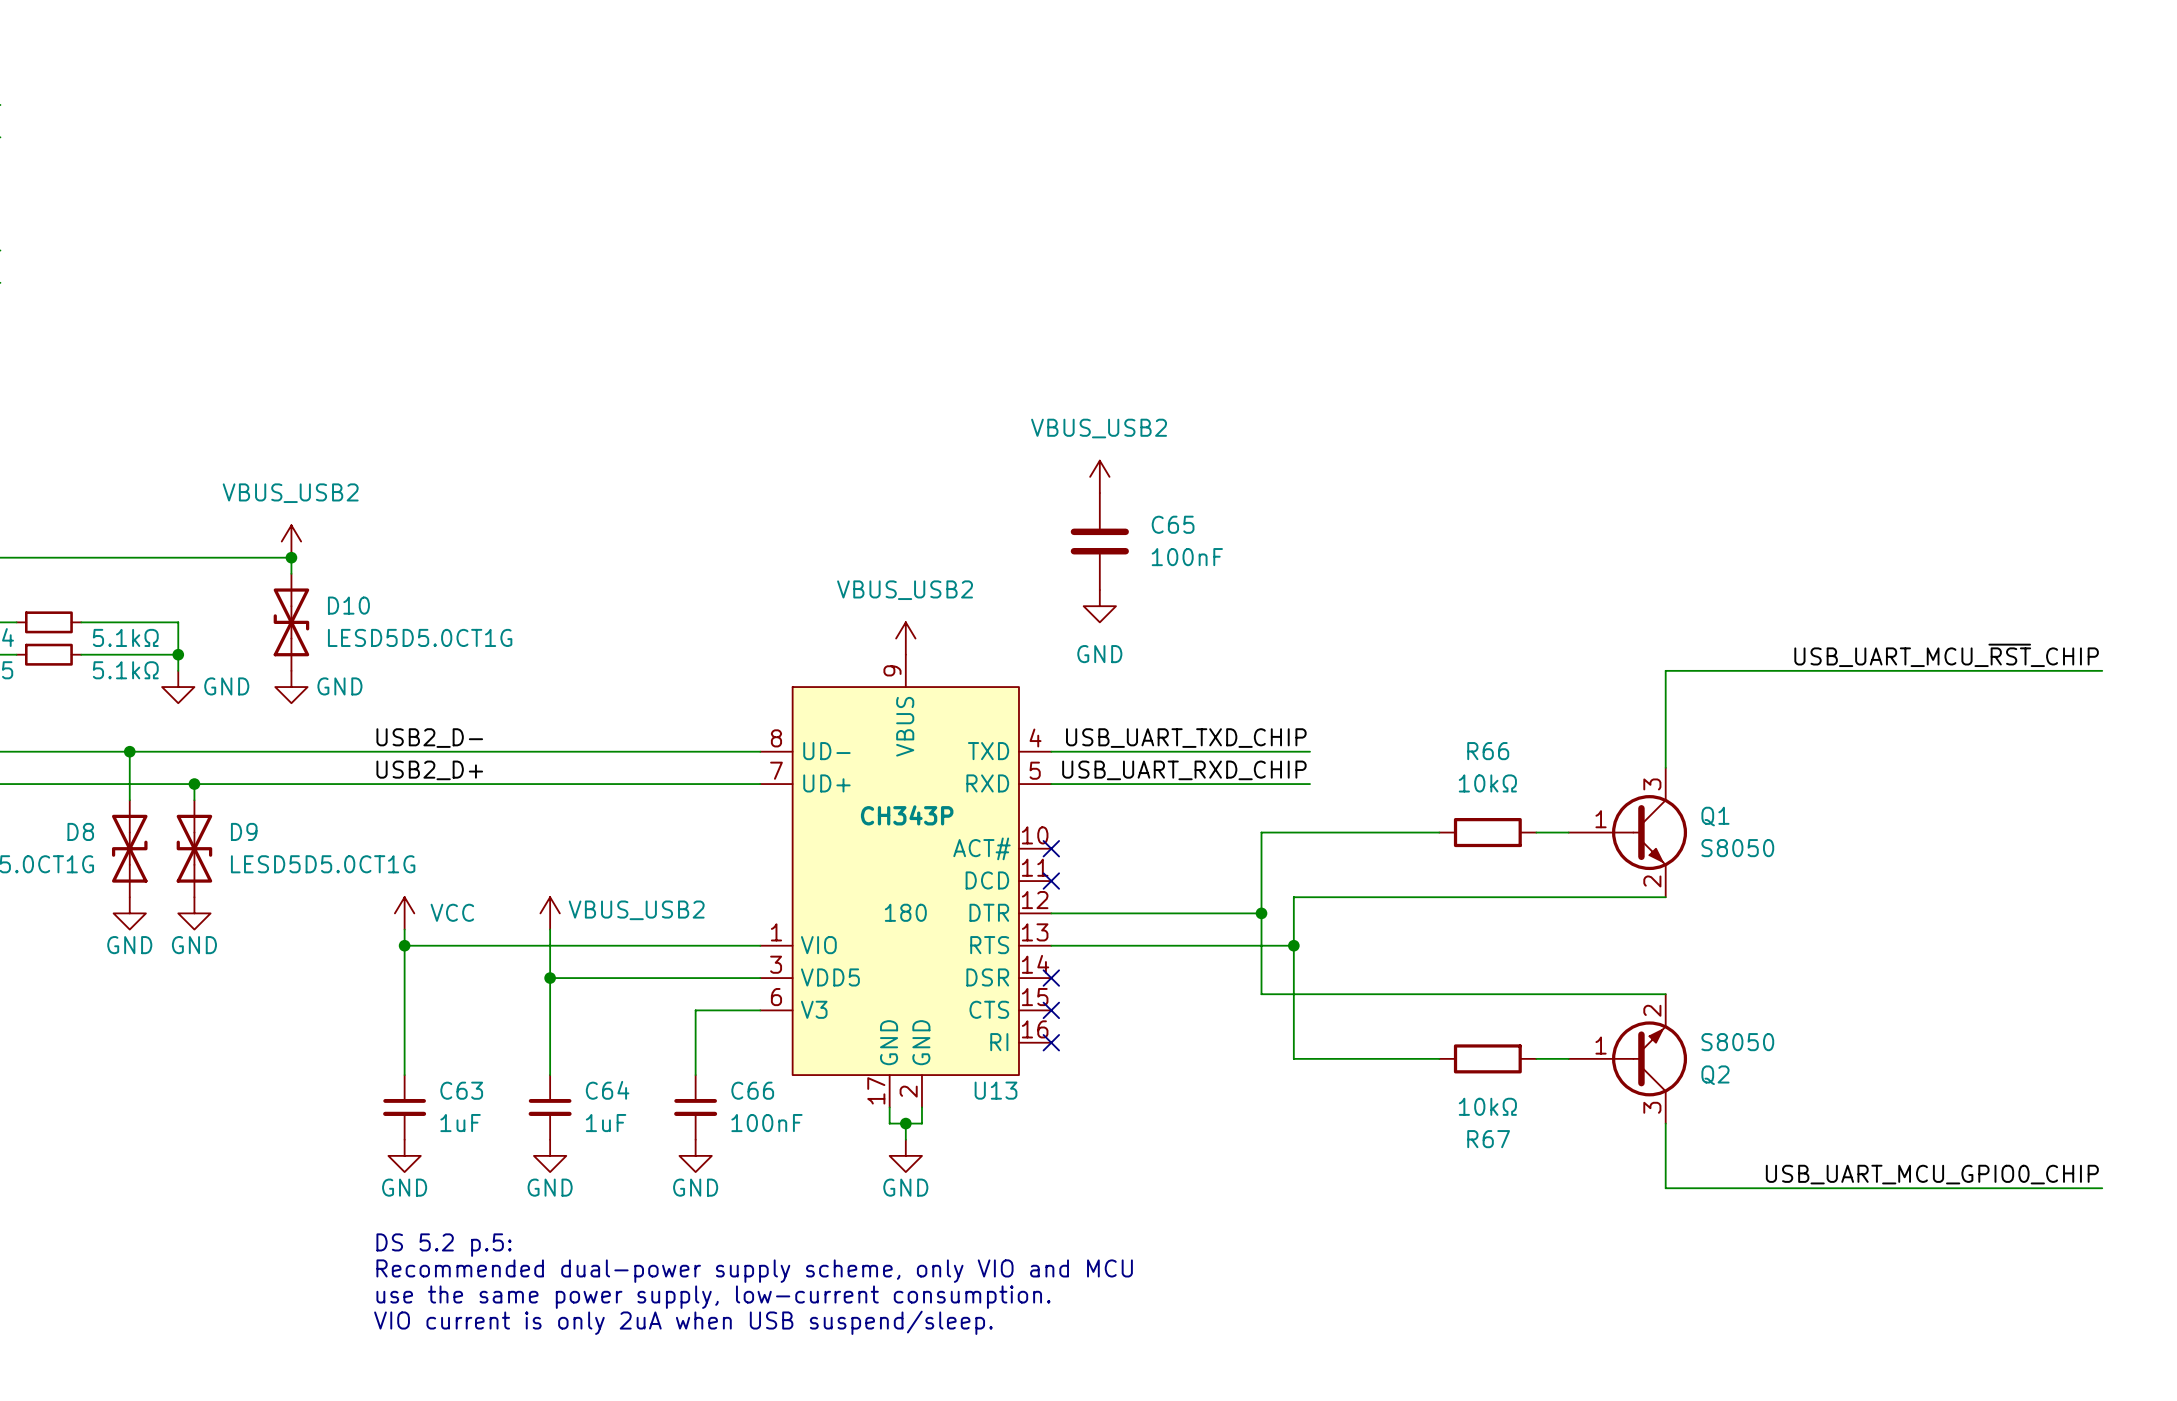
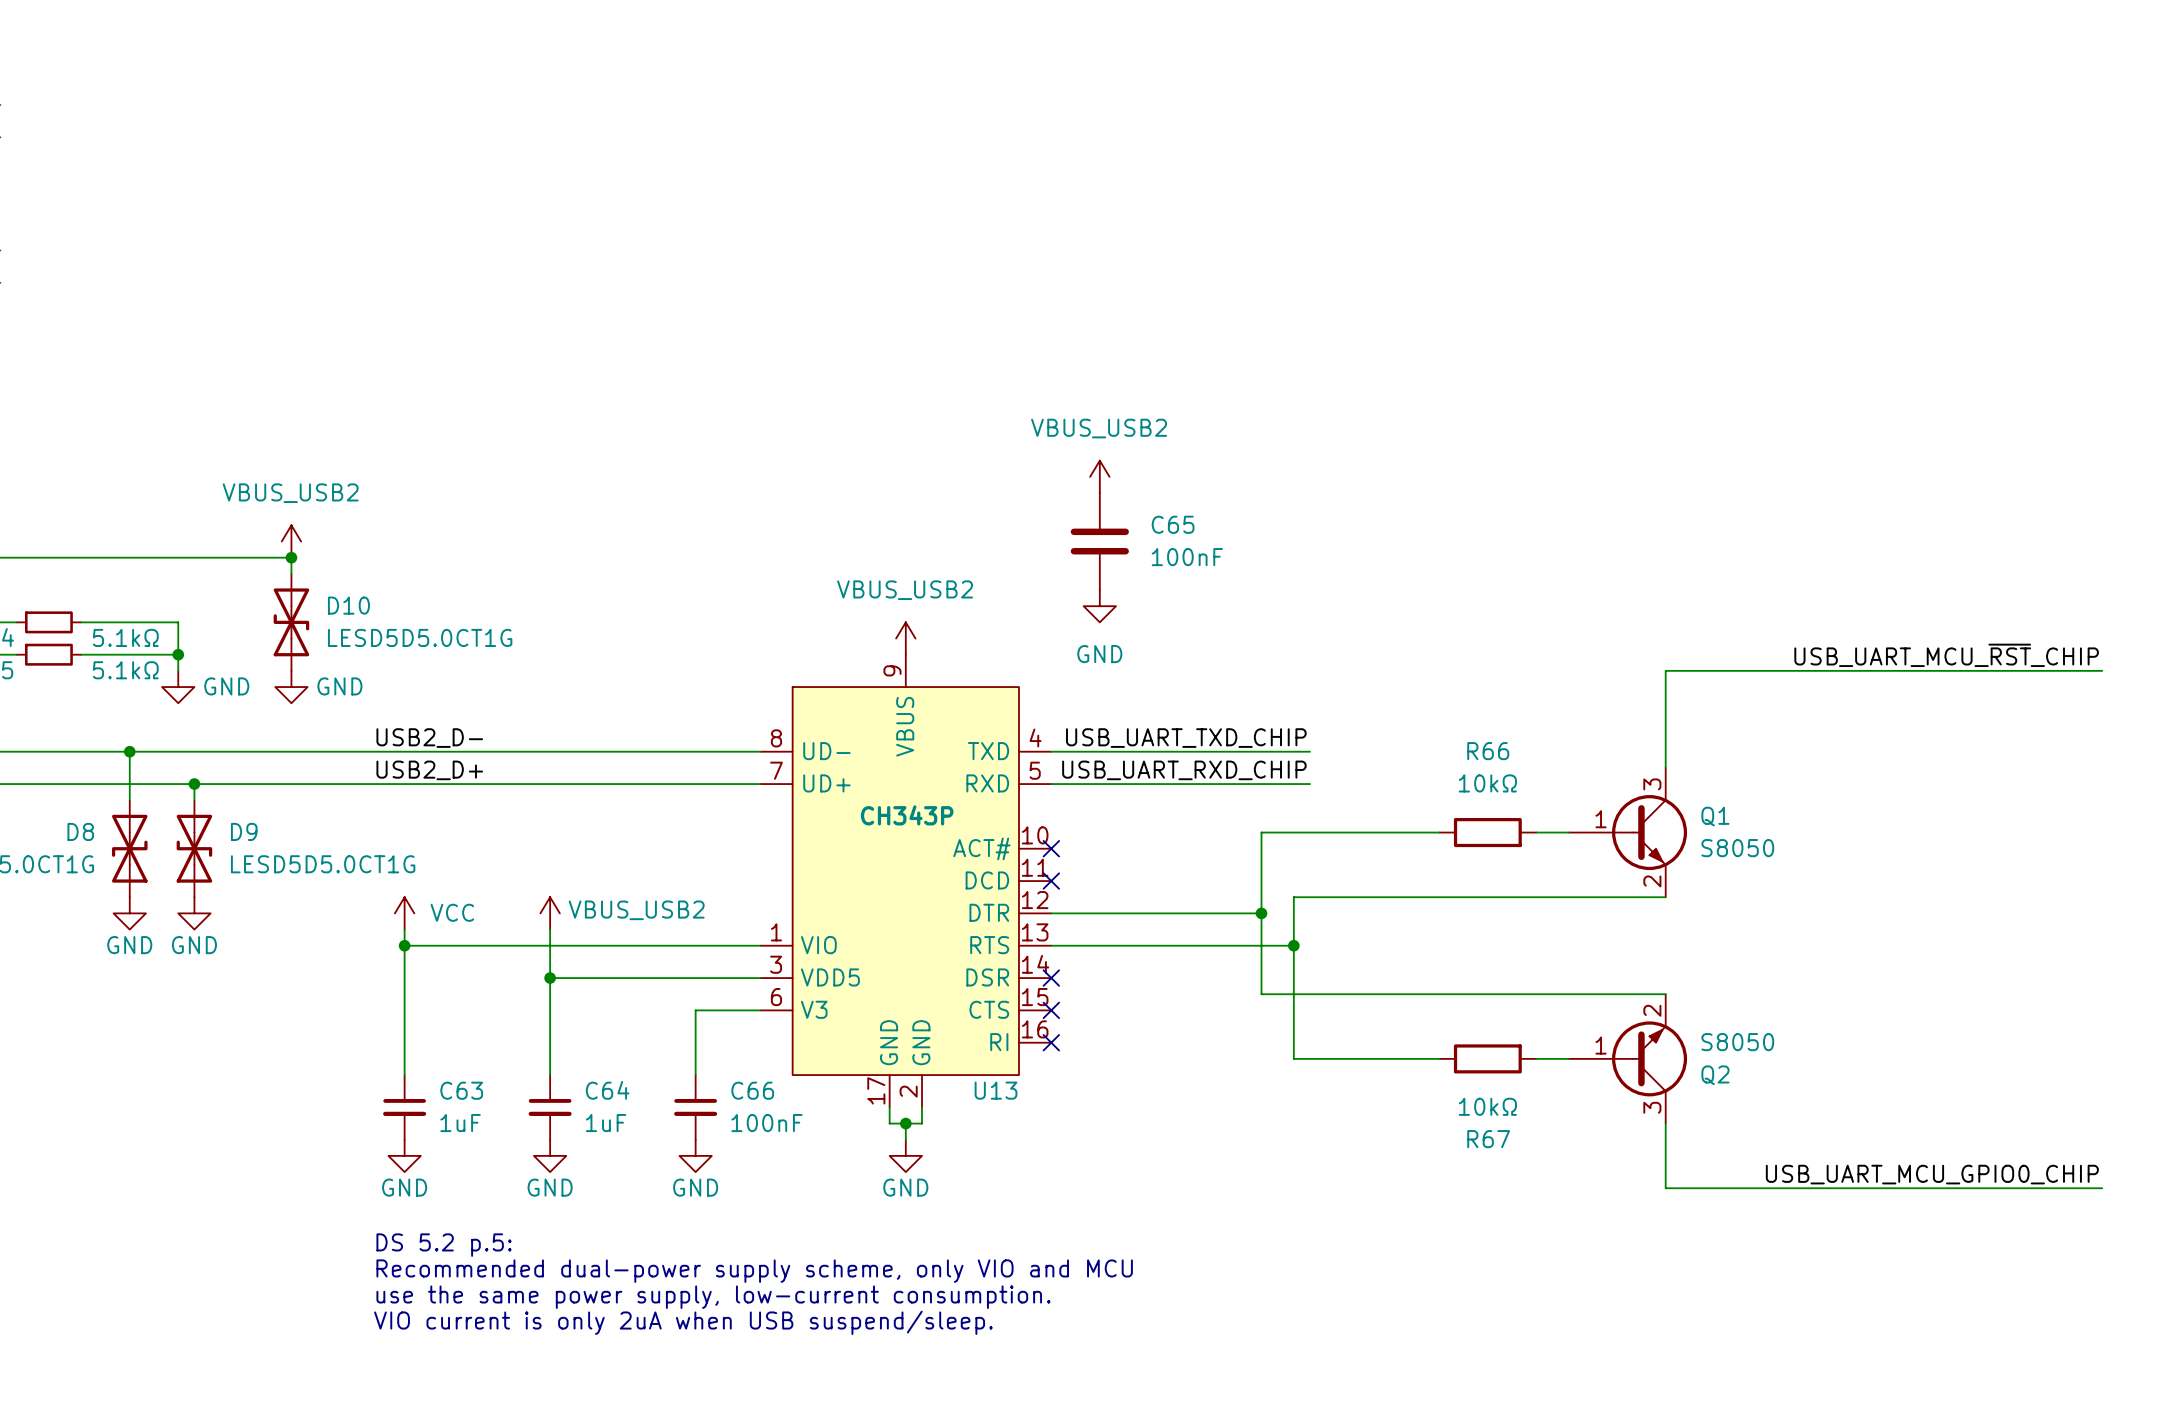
U13 text: 180 (905, 912) -> none

